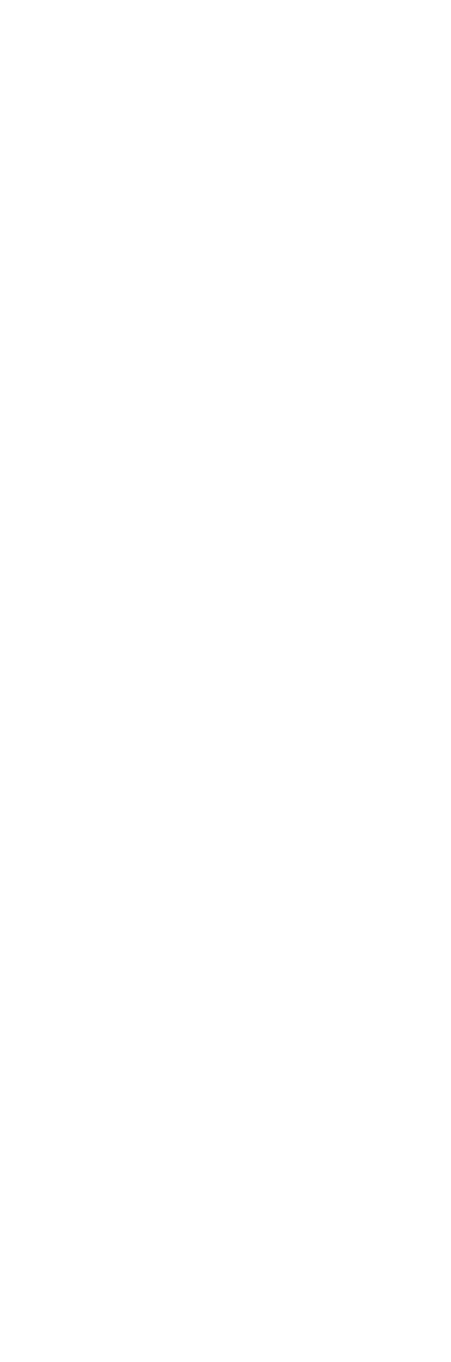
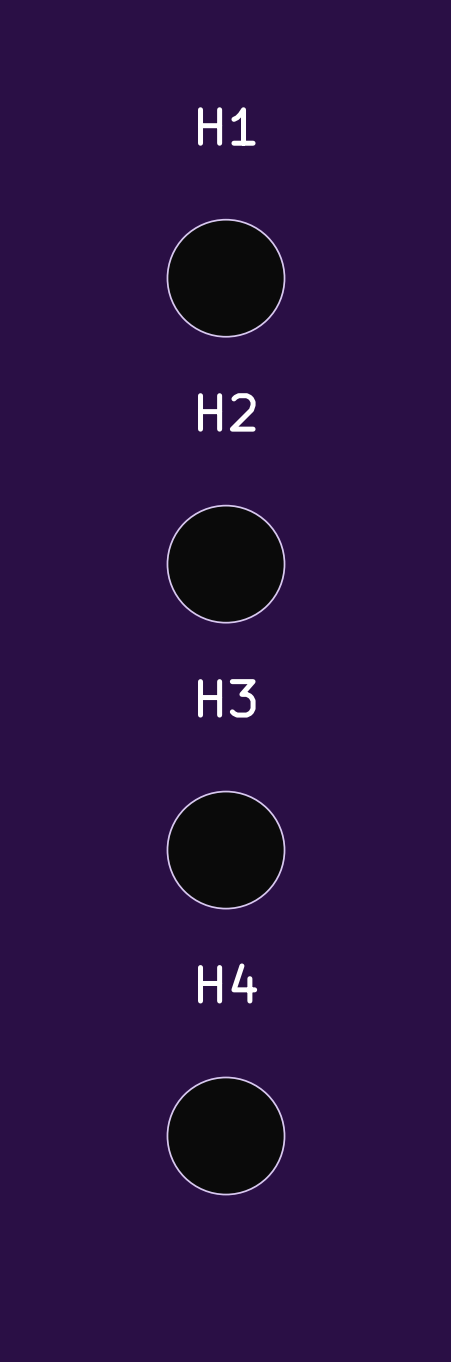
H1: none -> (225, 278)
H2: none -> (225, 564)
H3: none -> (225, 850)
H4: none -> (225, 1136)

